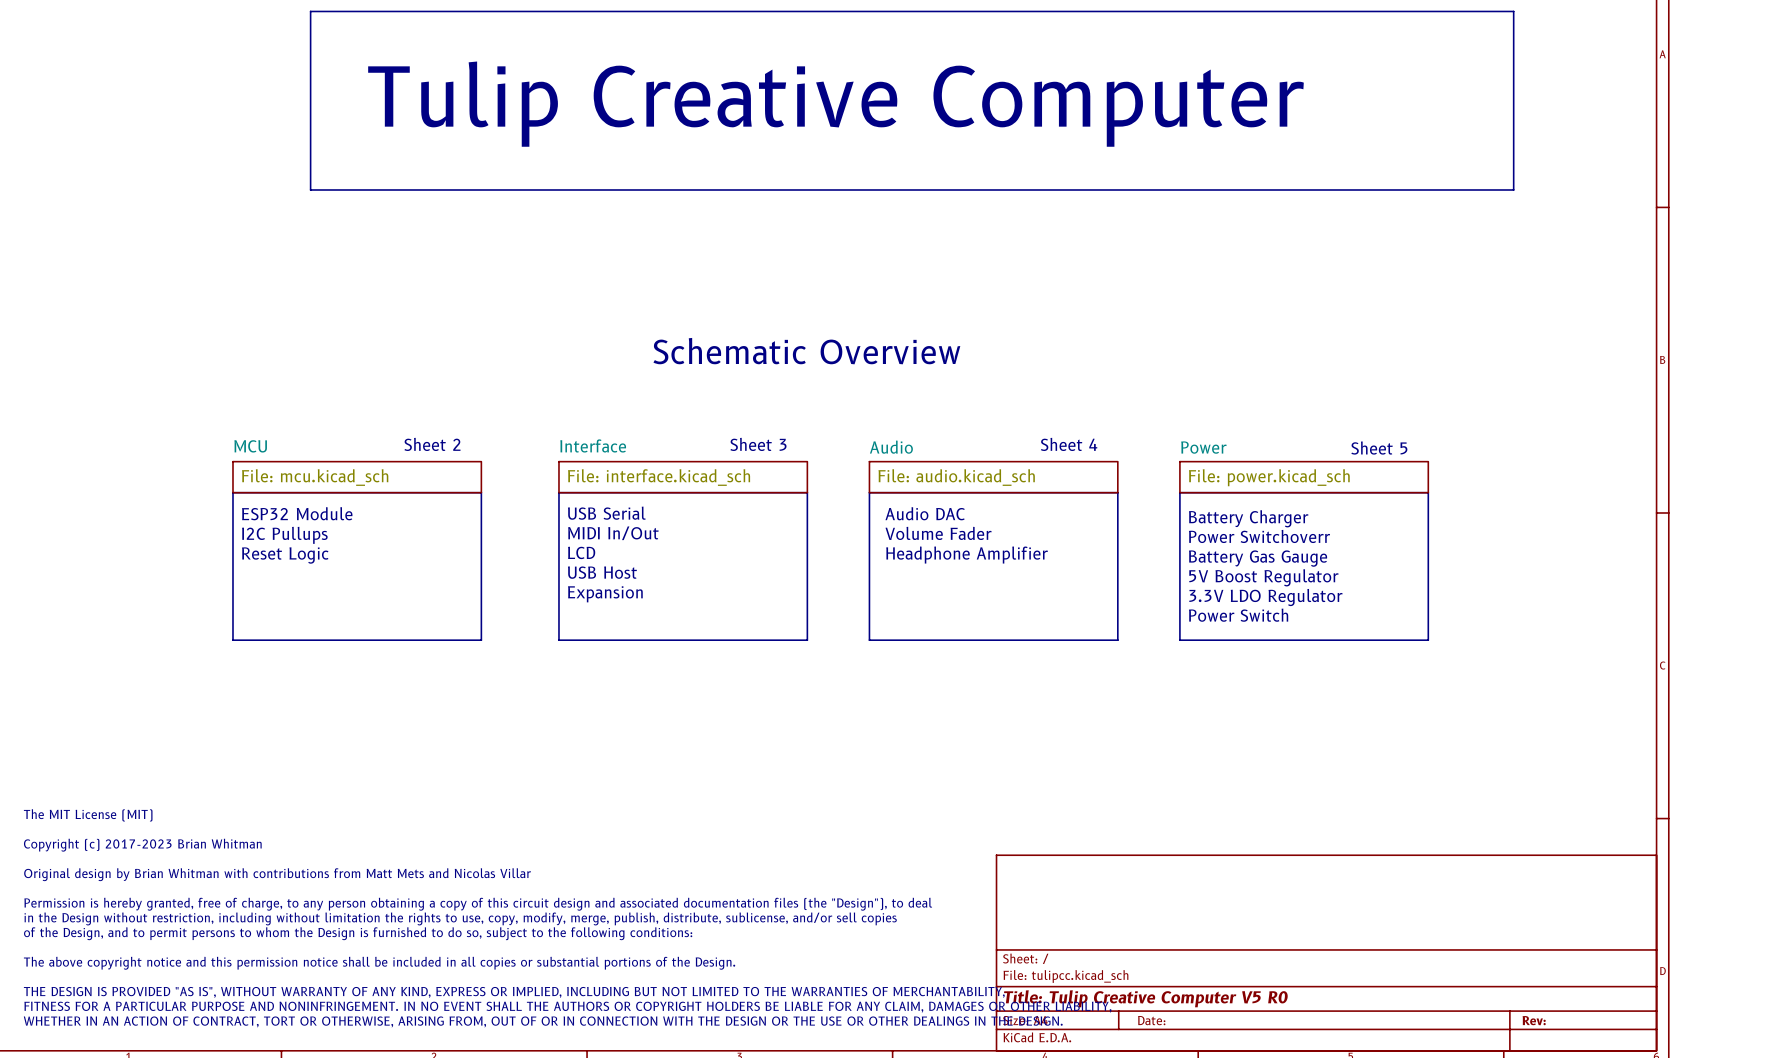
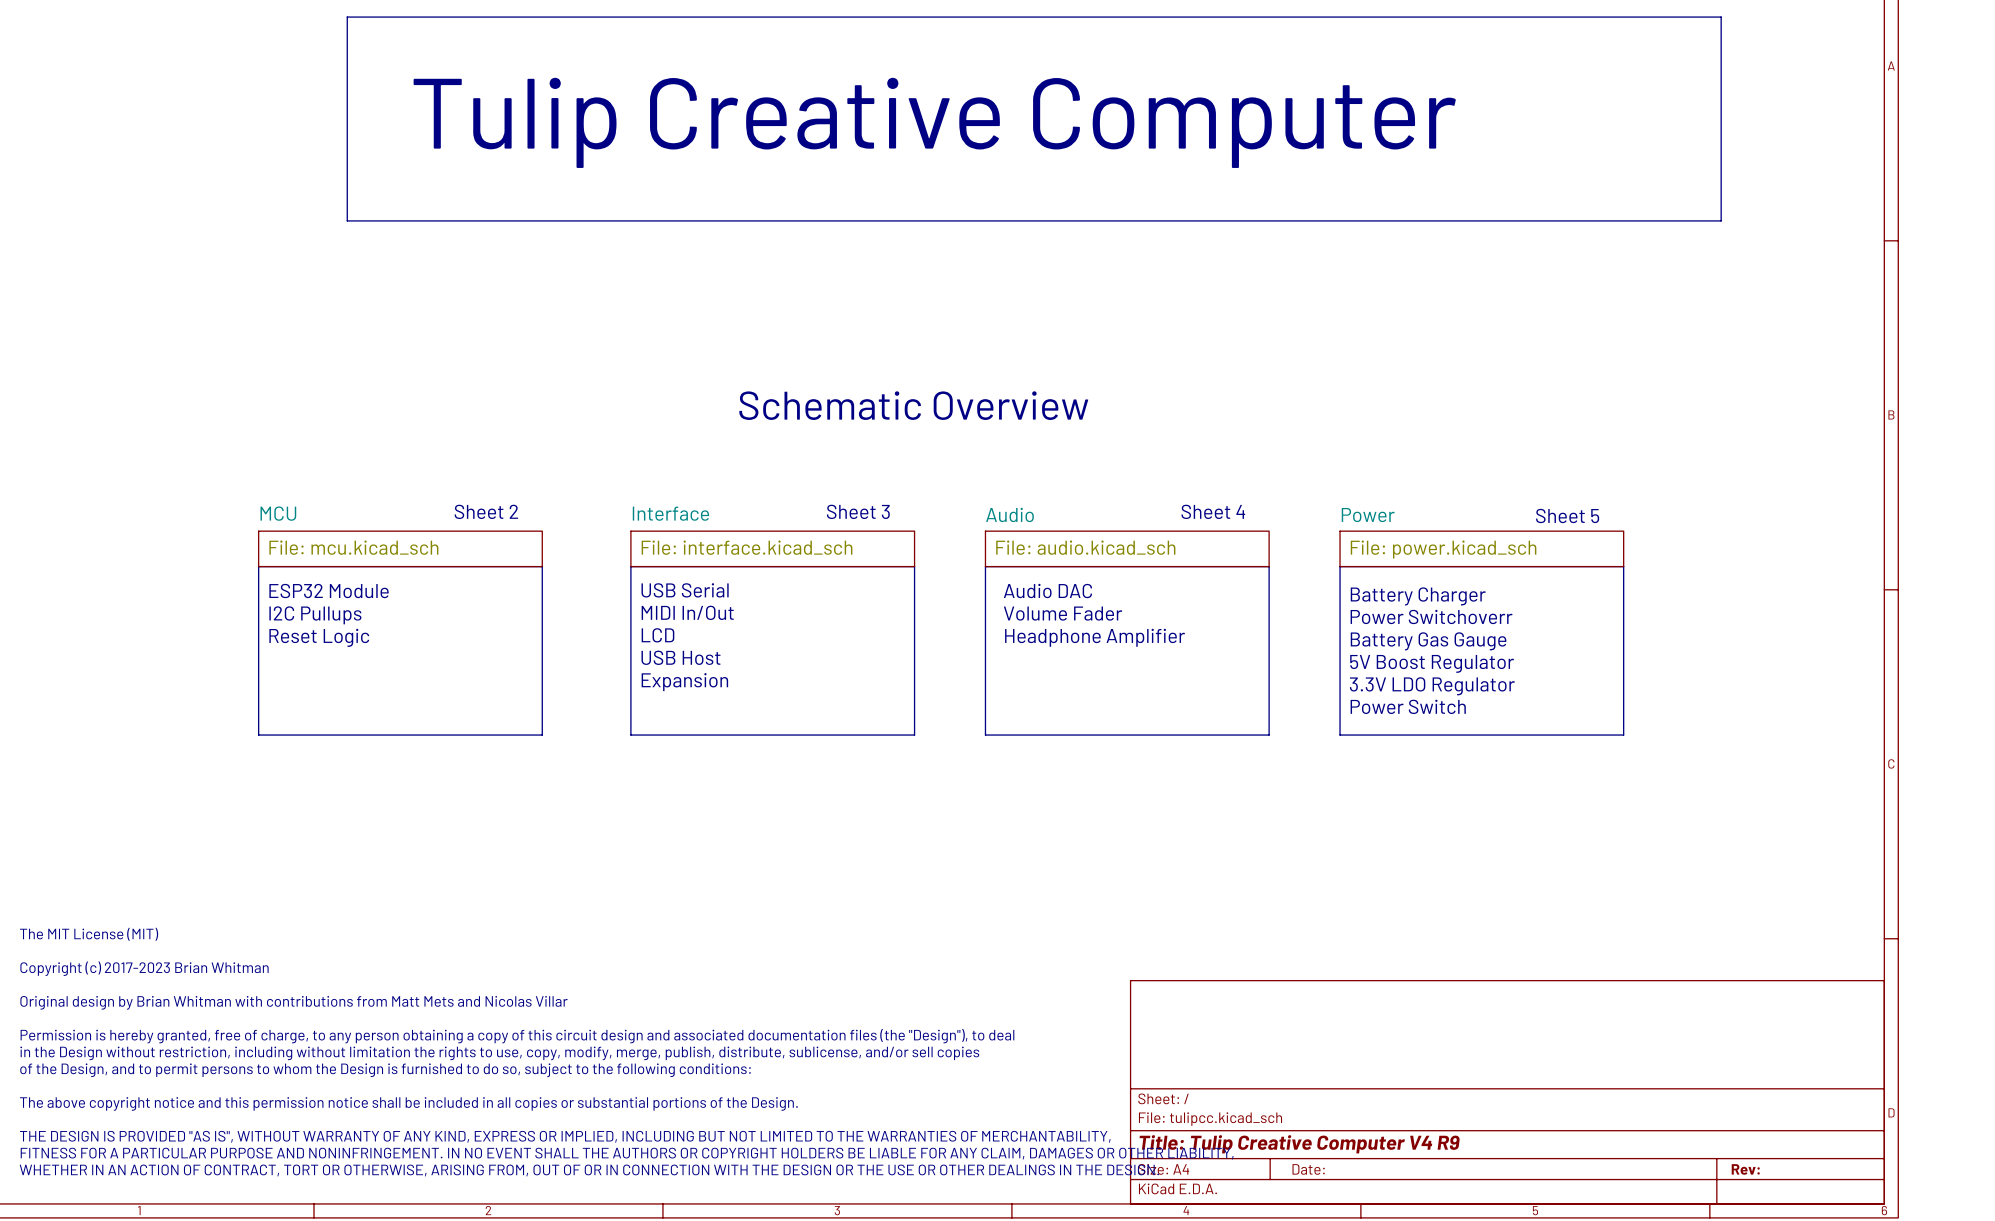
title block: Title: Tulip Creative Computer V5 R0 (1145, 998) -> Title: Tulip Creative Computer V4 R9 (1299, 1144)

